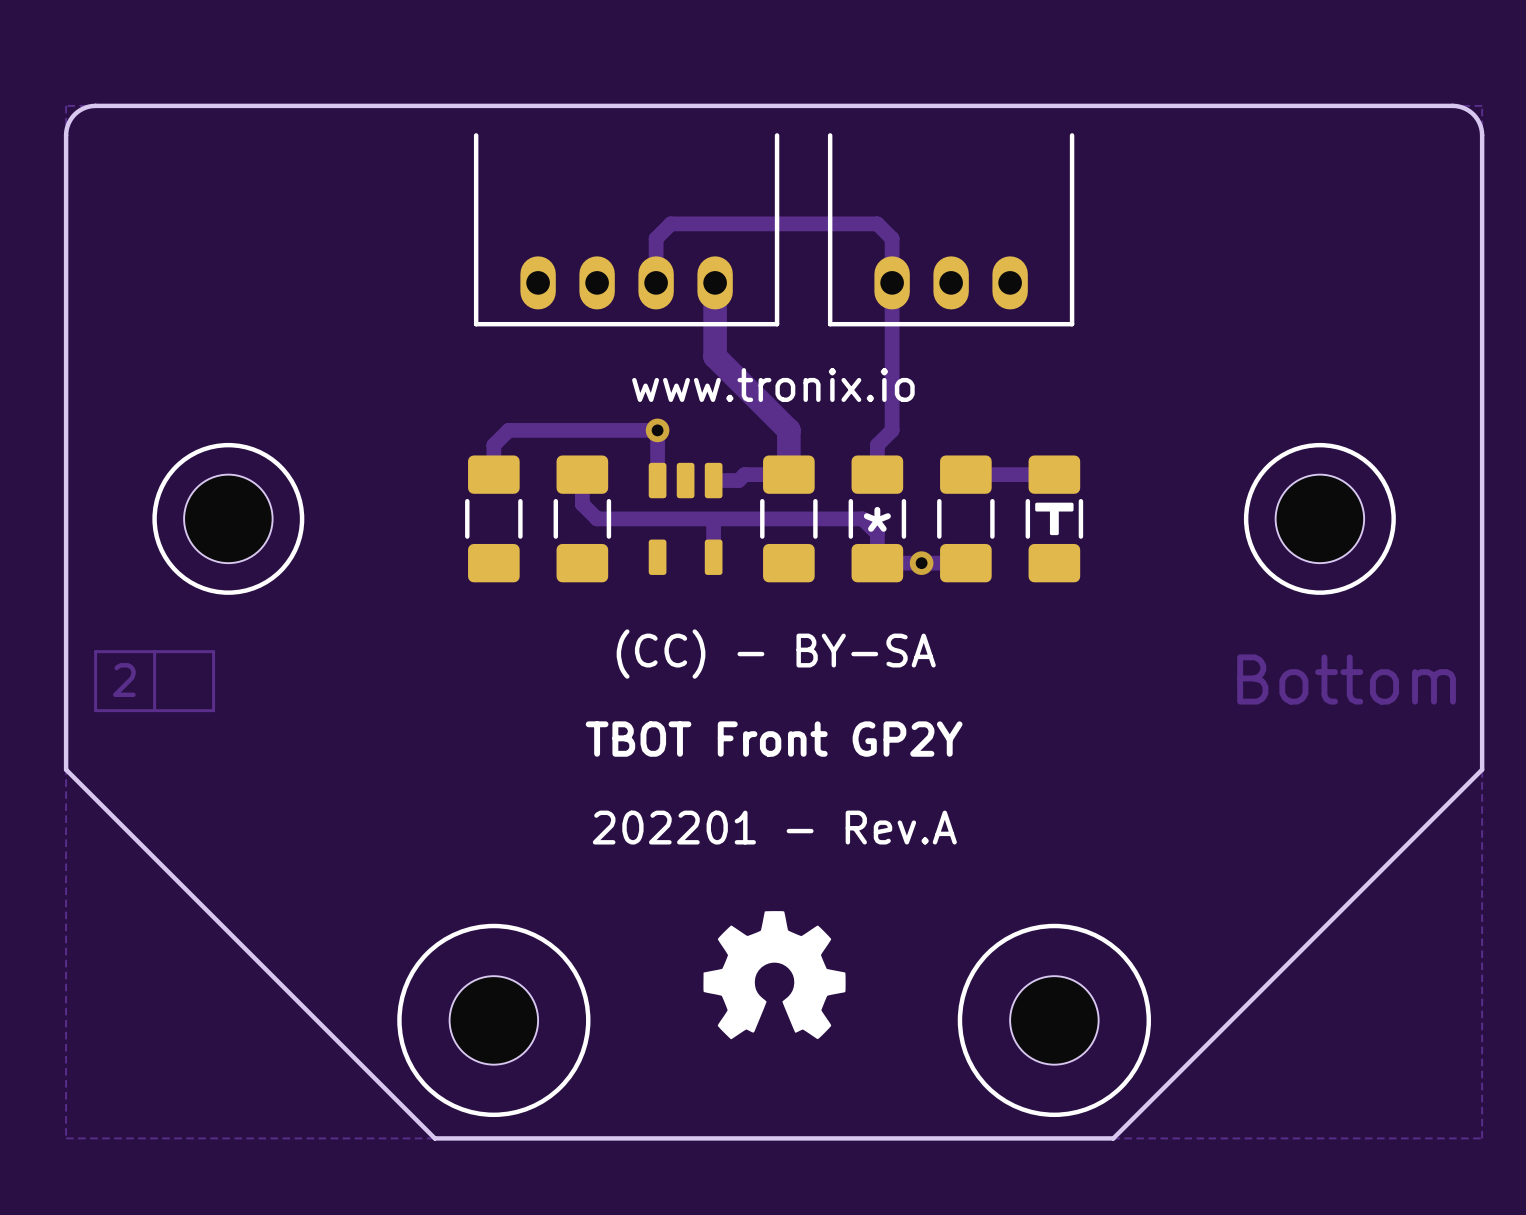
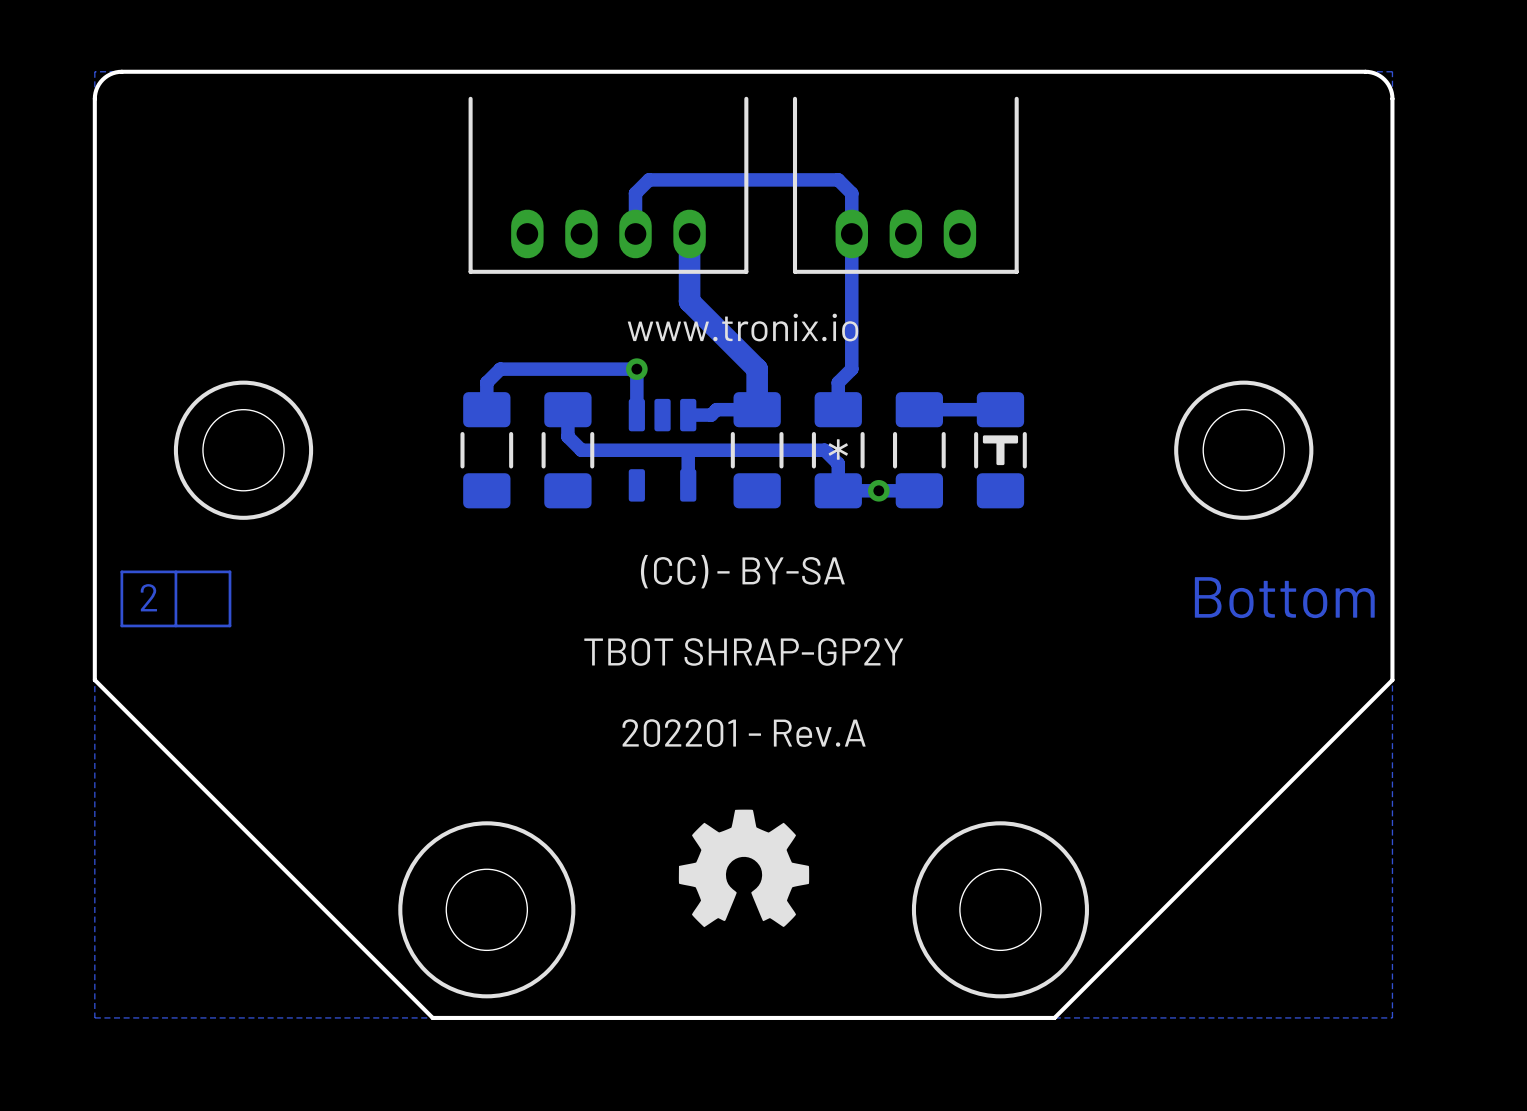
text: TBOT Front GP2Y (774, 739) -> TBOT SHRAP-GP2Y (743, 651)

